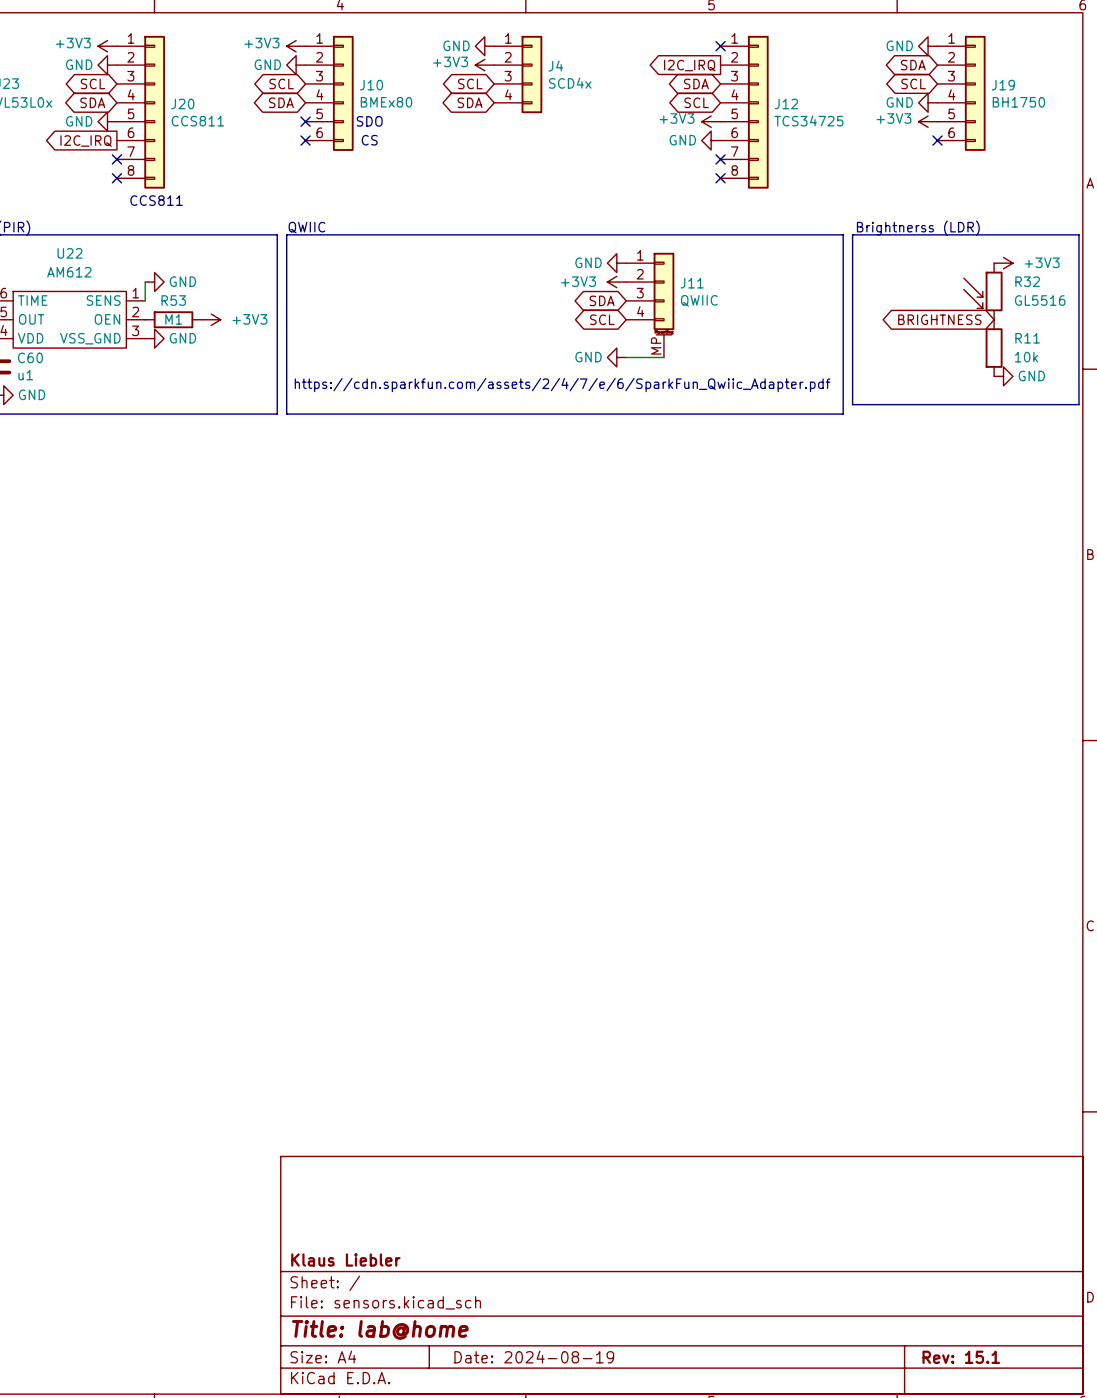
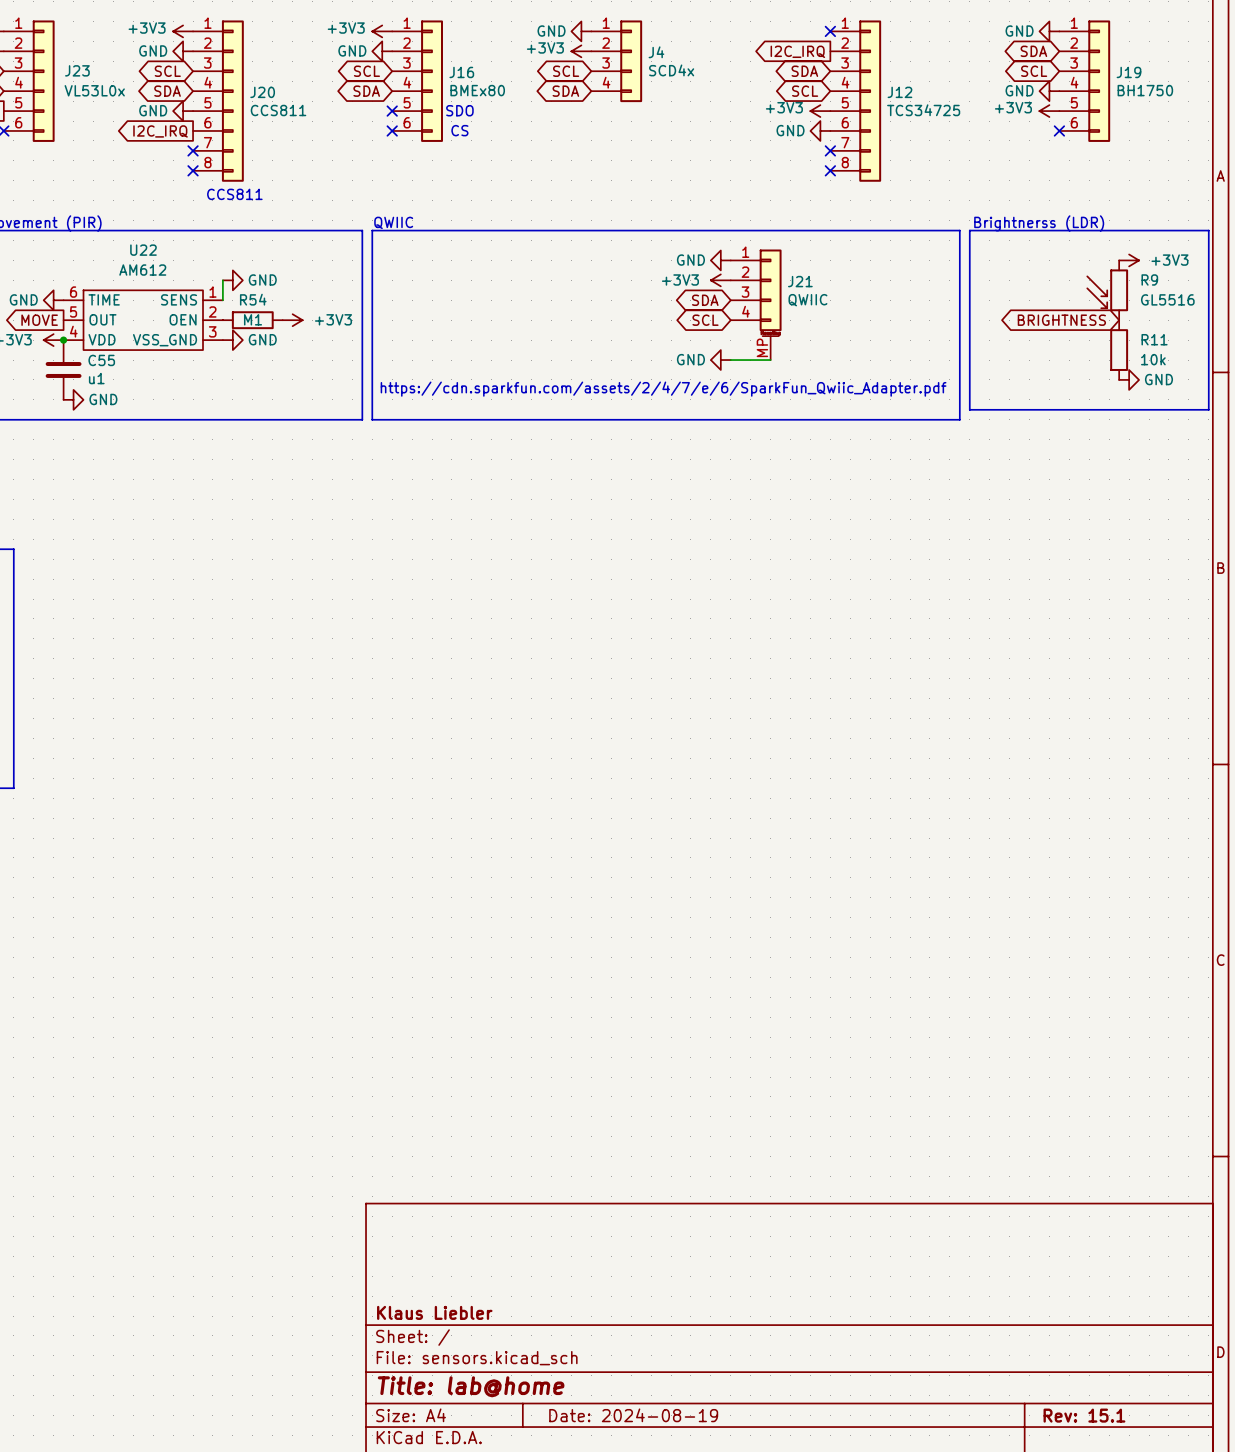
J10 name: J10 (371, 85) -> J16 (461, 72)
R32 name: R32 (1027, 281) -> R9 (1149, 279)
J11 name: J11 (692, 283) -> J21 (800, 281)
R53 name: R53 (173, 300) -> R54 (253, 299)
C60 name: C60 (30, 357) -> C55 (101, 360)

